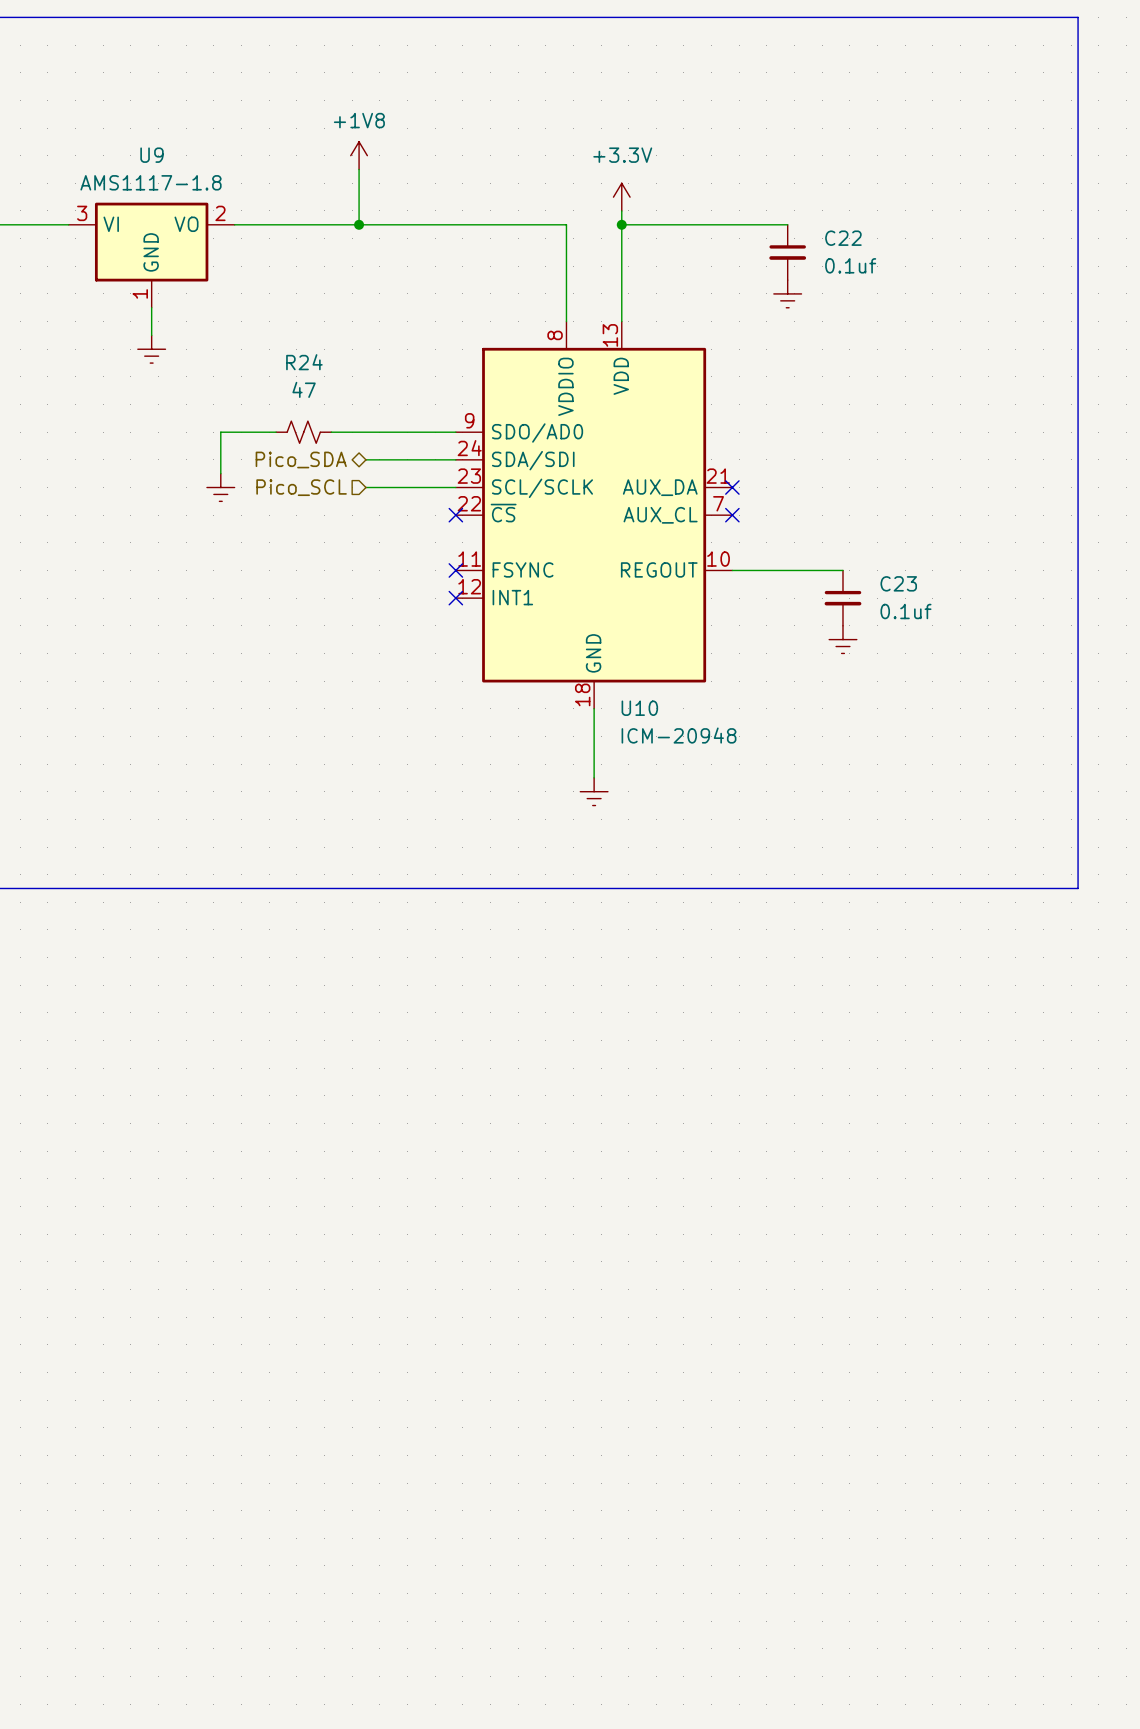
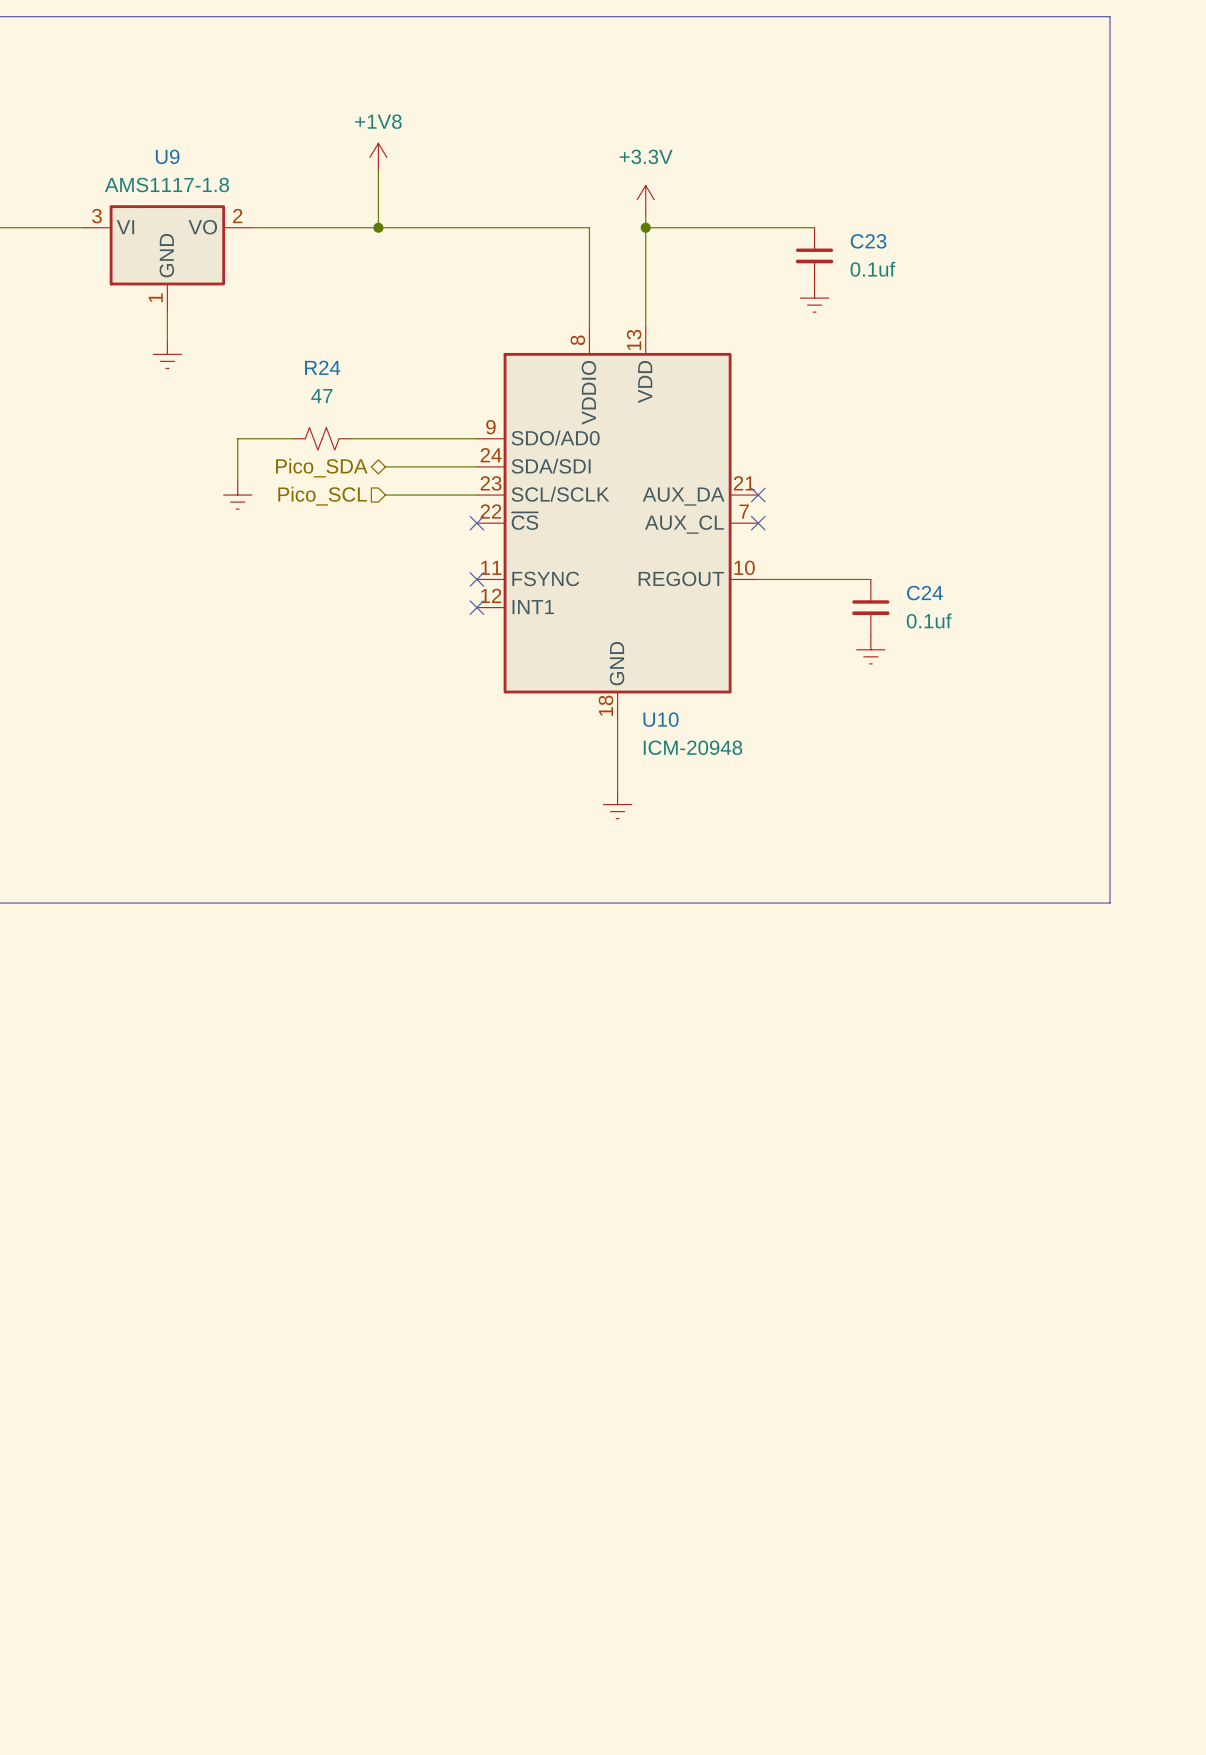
C22 name: C22 (843, 238) -> C23 (868, 241)
C23 name: C23 (898, 583) -> C24 (924, 593)

